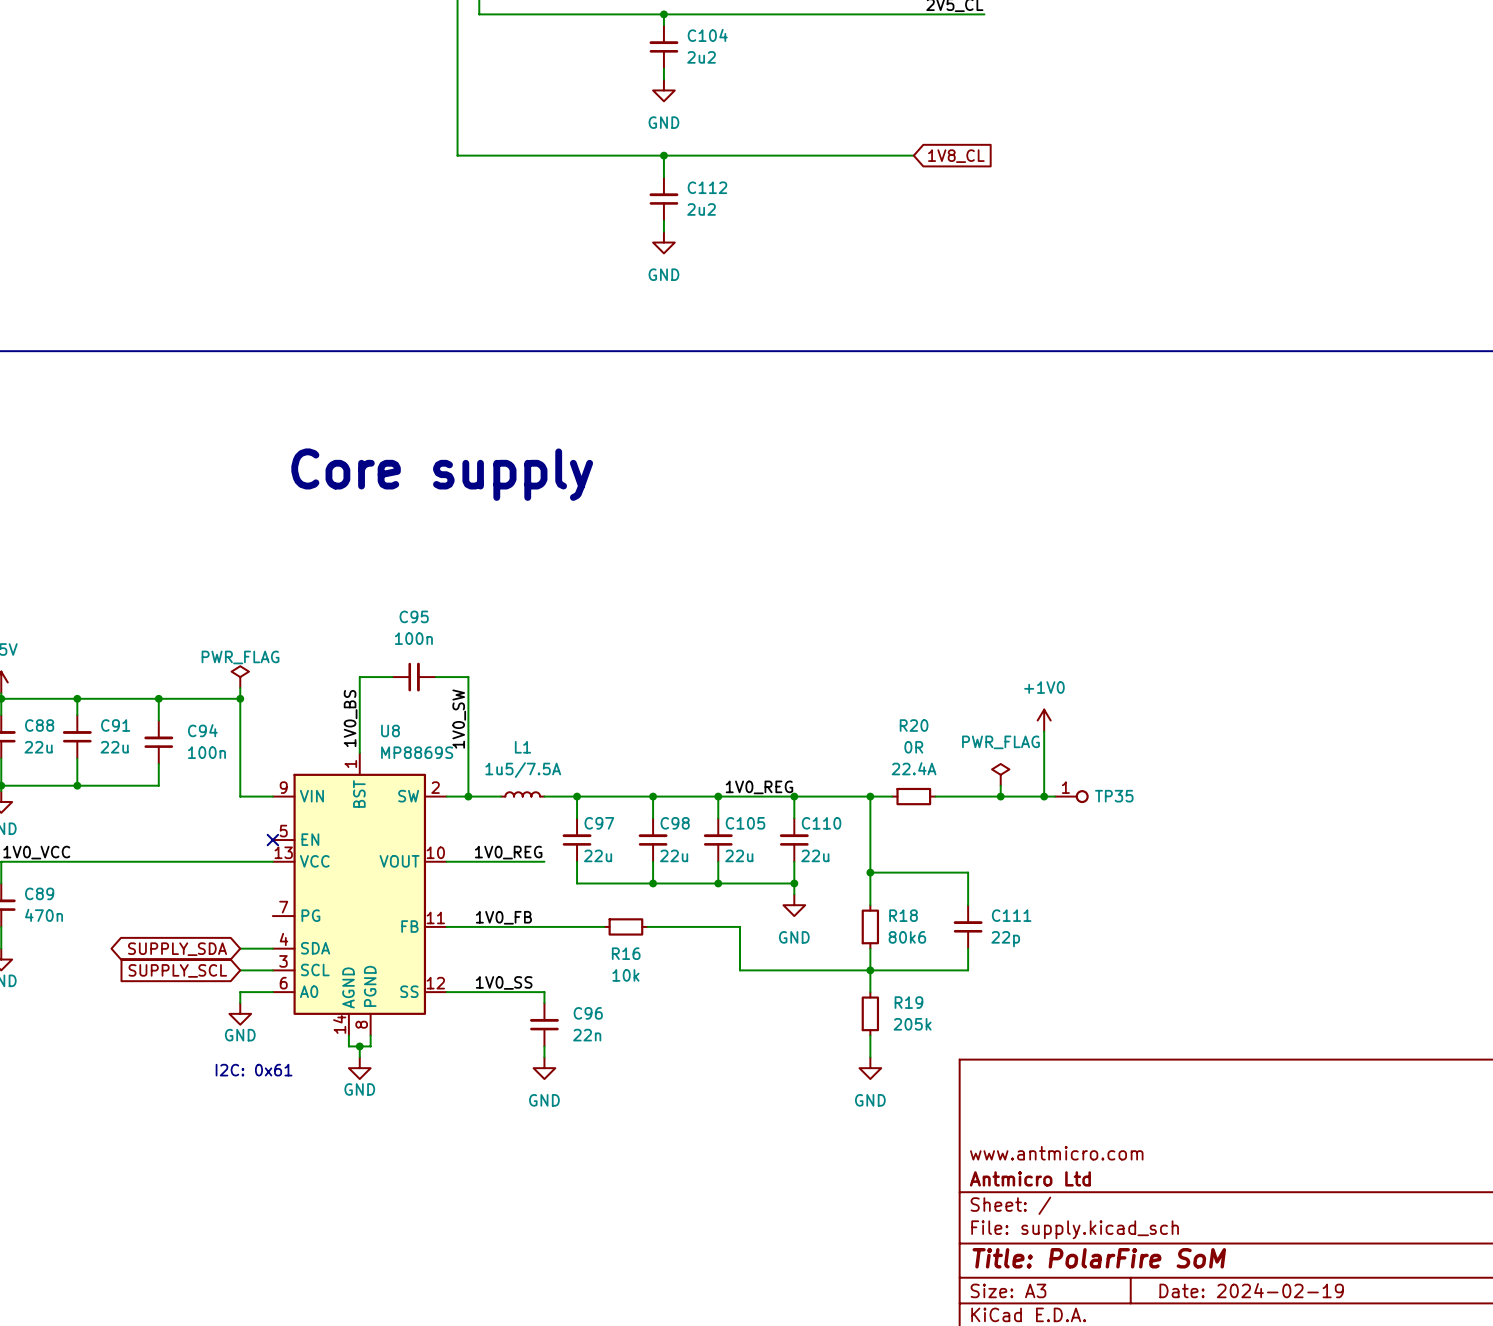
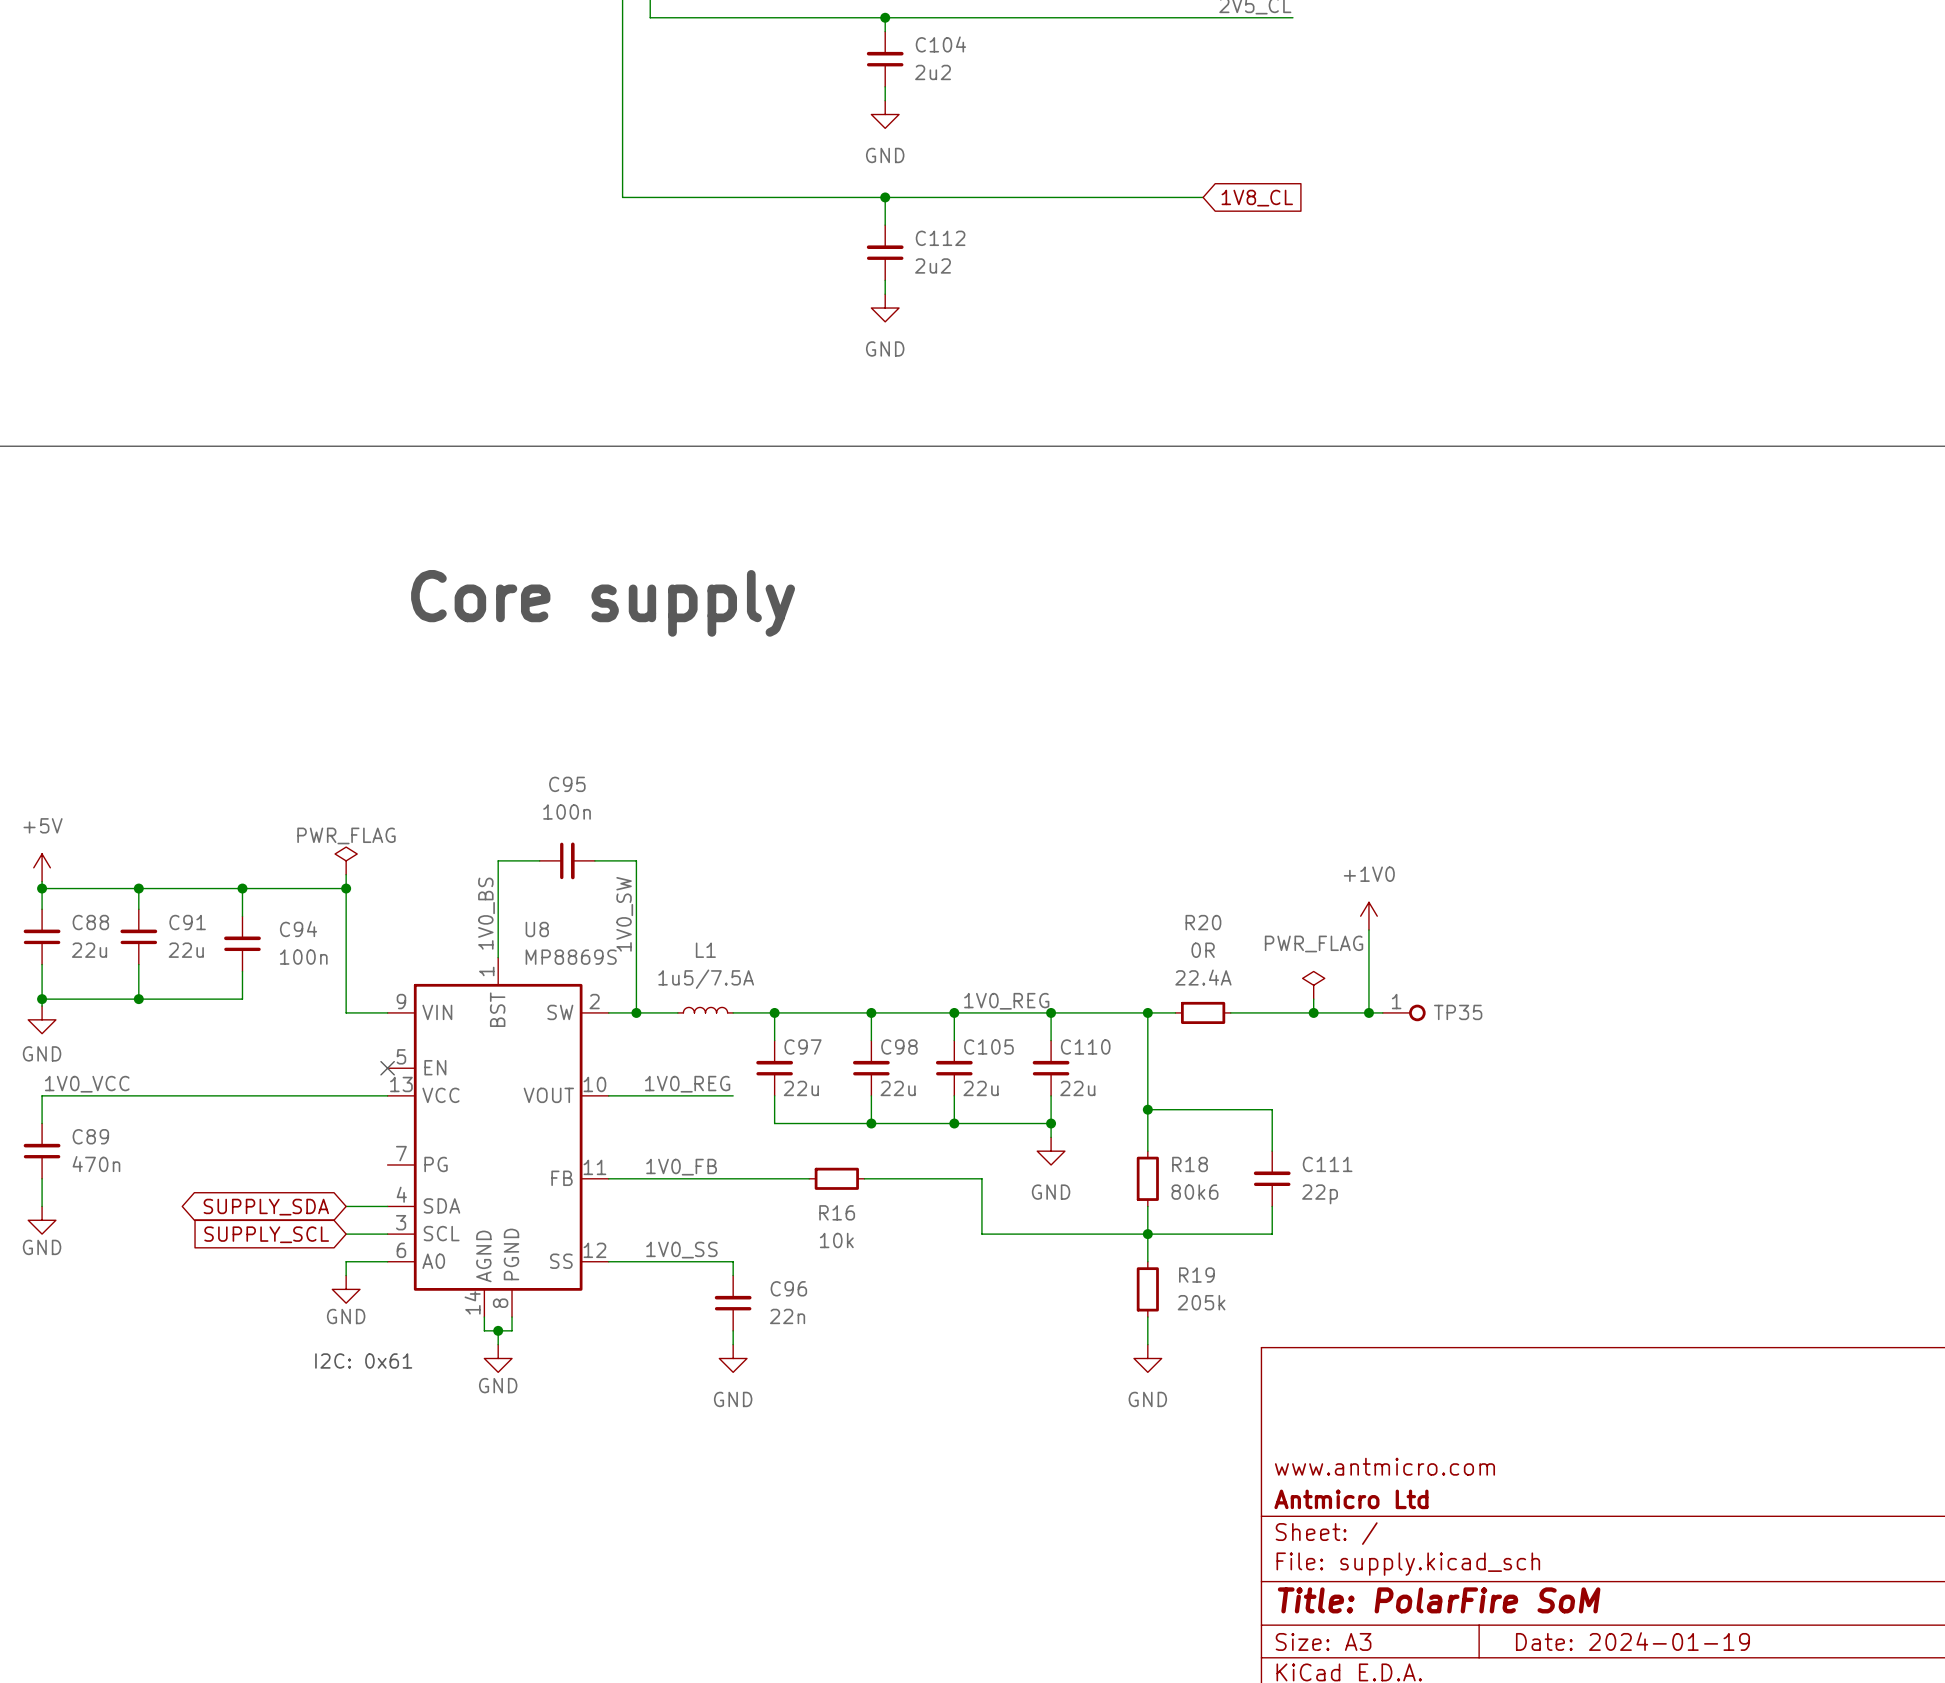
title block: Date: 2024-02-19 (1251, 1290) -> Date: 2024-01-19 (1632, 1641)

